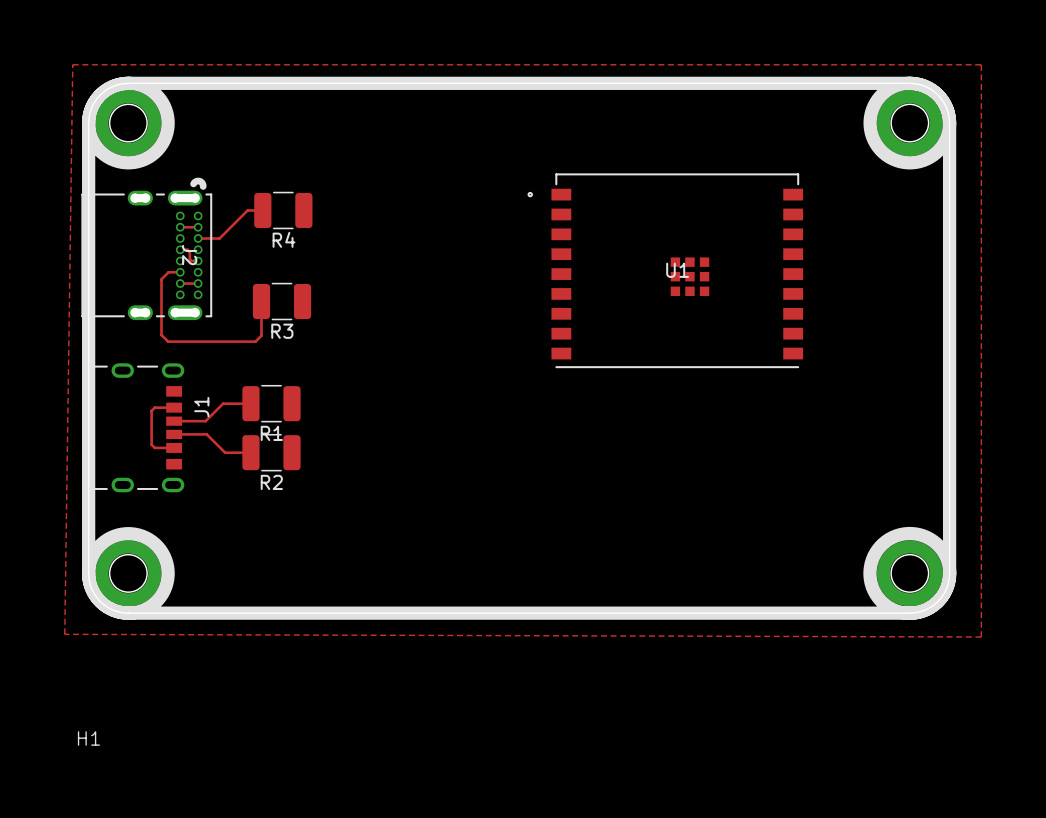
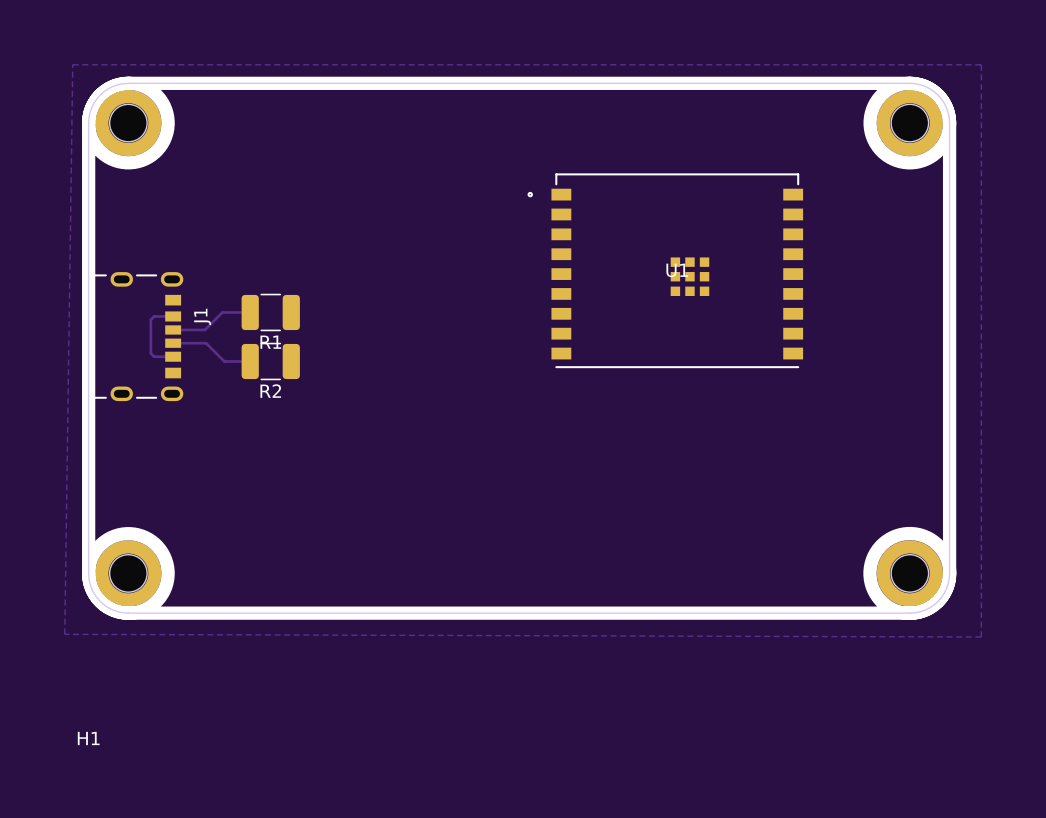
track: (262, 210) (247, 210) (219, 238) (198, 238) -> none
R4: (283, 210) -> none
track: (180, 227) (198, 227) -> none
J2: (146, 248) -> none
track: (180, 249) (187, 249) (189, 252) (189, 259) (198, 261) -> none
track: (180, 272) (168, 272) (161, 279) (161, 335) (168, 341) (255, 341) (261, 335) (261, 301) -> none
track: (180, 283) (198, 283) -> none
R3: (282, 301) -> none
track: (250, 403) (223, 403) (205, 421) (173, 421) -> (250, 312) (222, 312) (204, 329) (173, 329)
R1 position: (271, 403) -> (270, 312)
track: (173, 407) (154, 407) (151, 410) (151, 444) (154, 447) (173, 447) -> (173, 316) (154, 316) (150, 319) (150, 353) (154, 356) (173, 356)
J1 position: (136, 427) -> (135, 336)
track: (173, 434) (206, 434) (225, 452) (250, 452) -> (173, 343) (206, 343) (224, 361) (250, 361)
R2 position: (271, 452) -> (270, 361)

